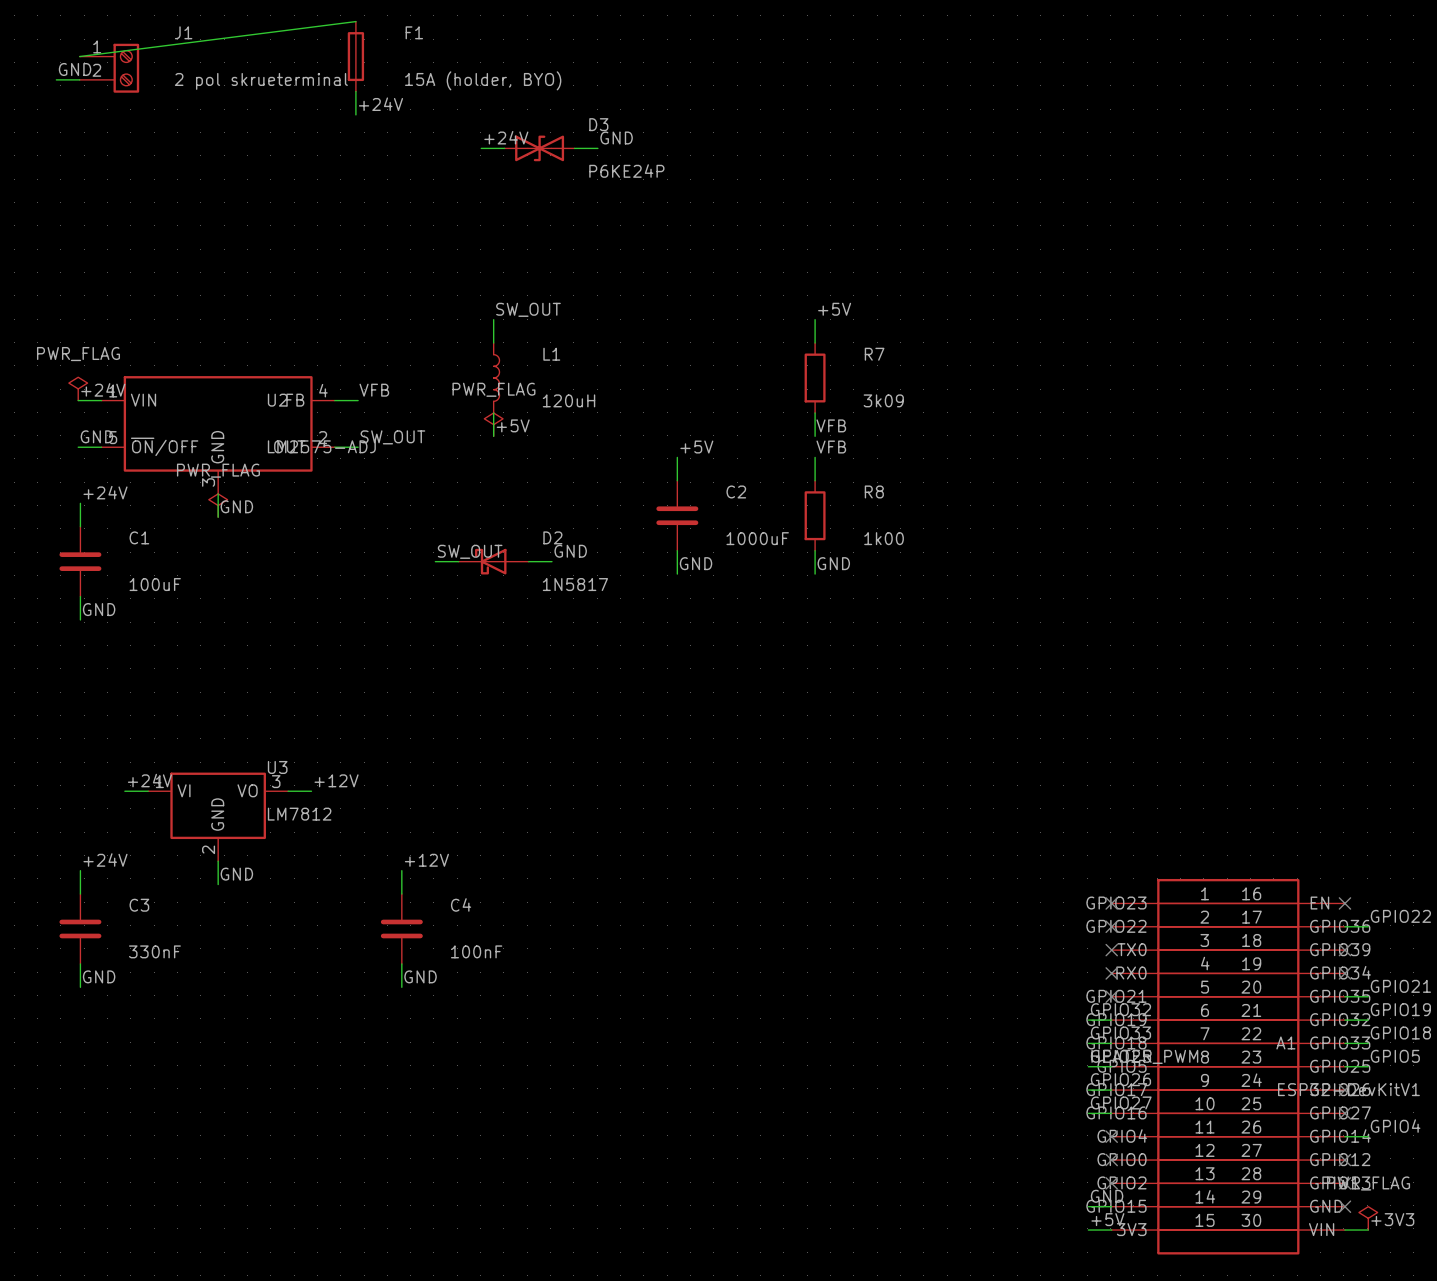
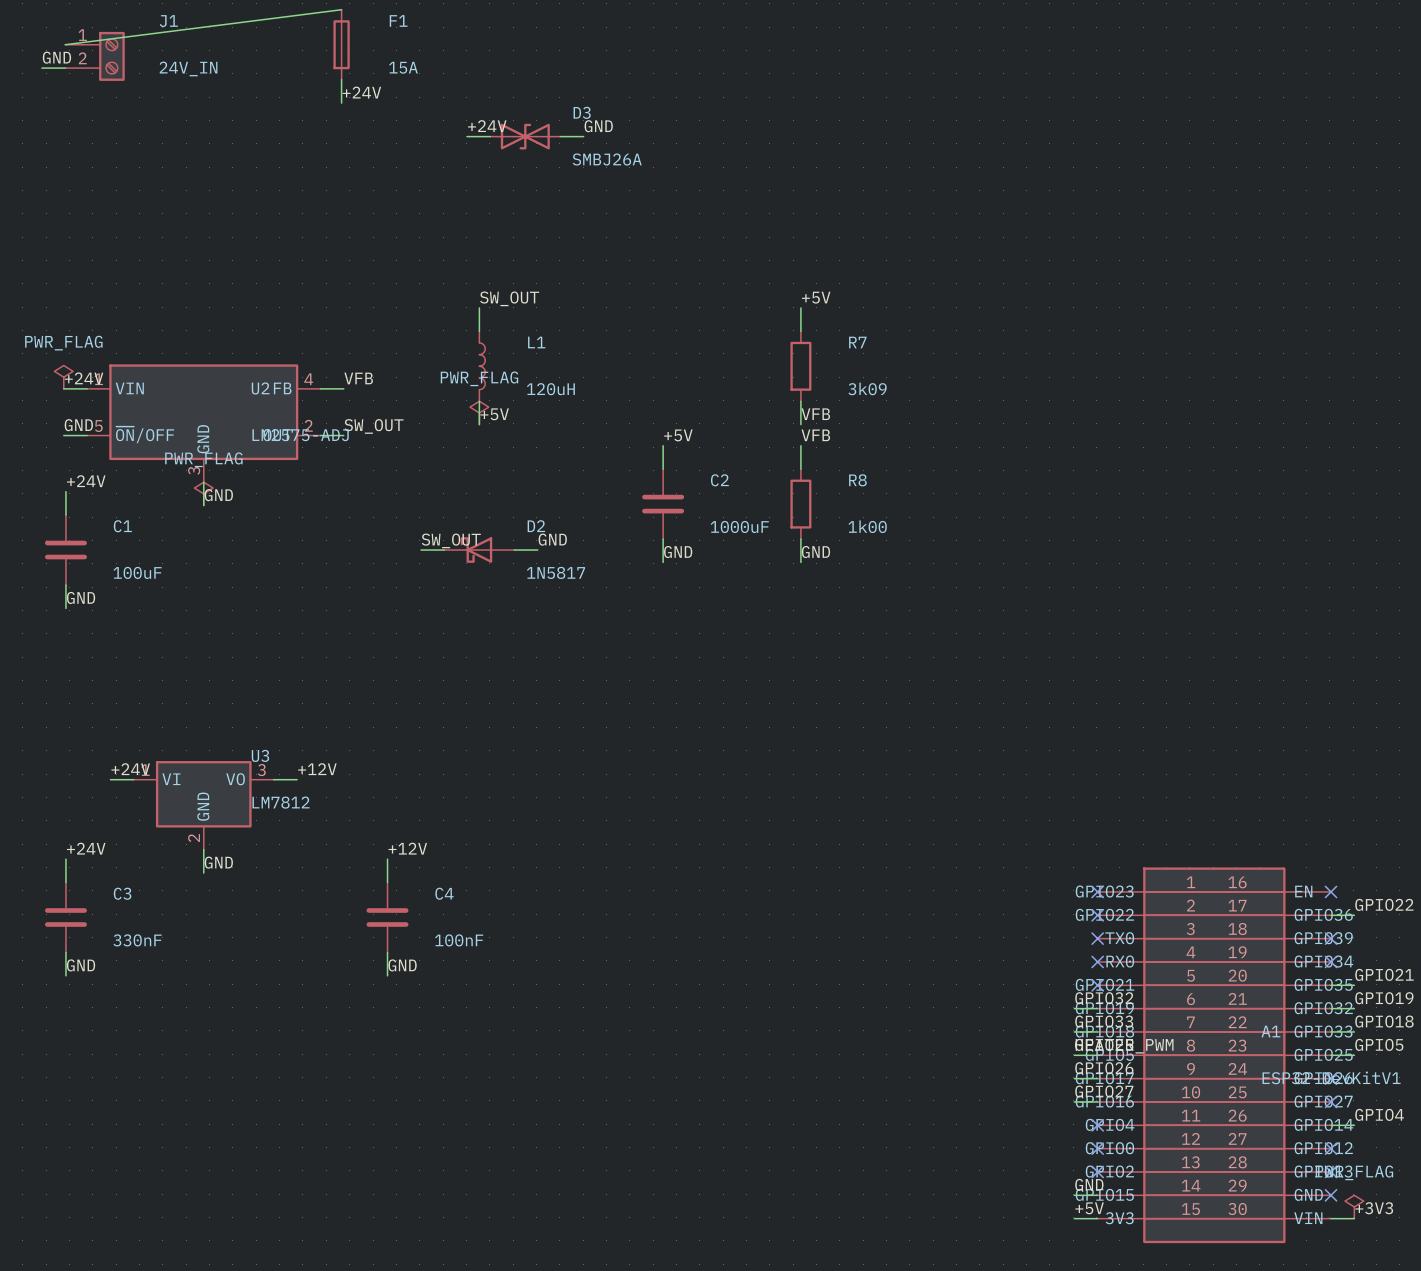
F1 value: 15A (holder, BYO) (483, 80) -> 15A (403, 67)
J1 value: 2 pol skrueterminal (261, 81) -> 24V_IN (188, 68)
D3 value: P6KE24P (626, 171) -> SMBJ26A (607, 159)

